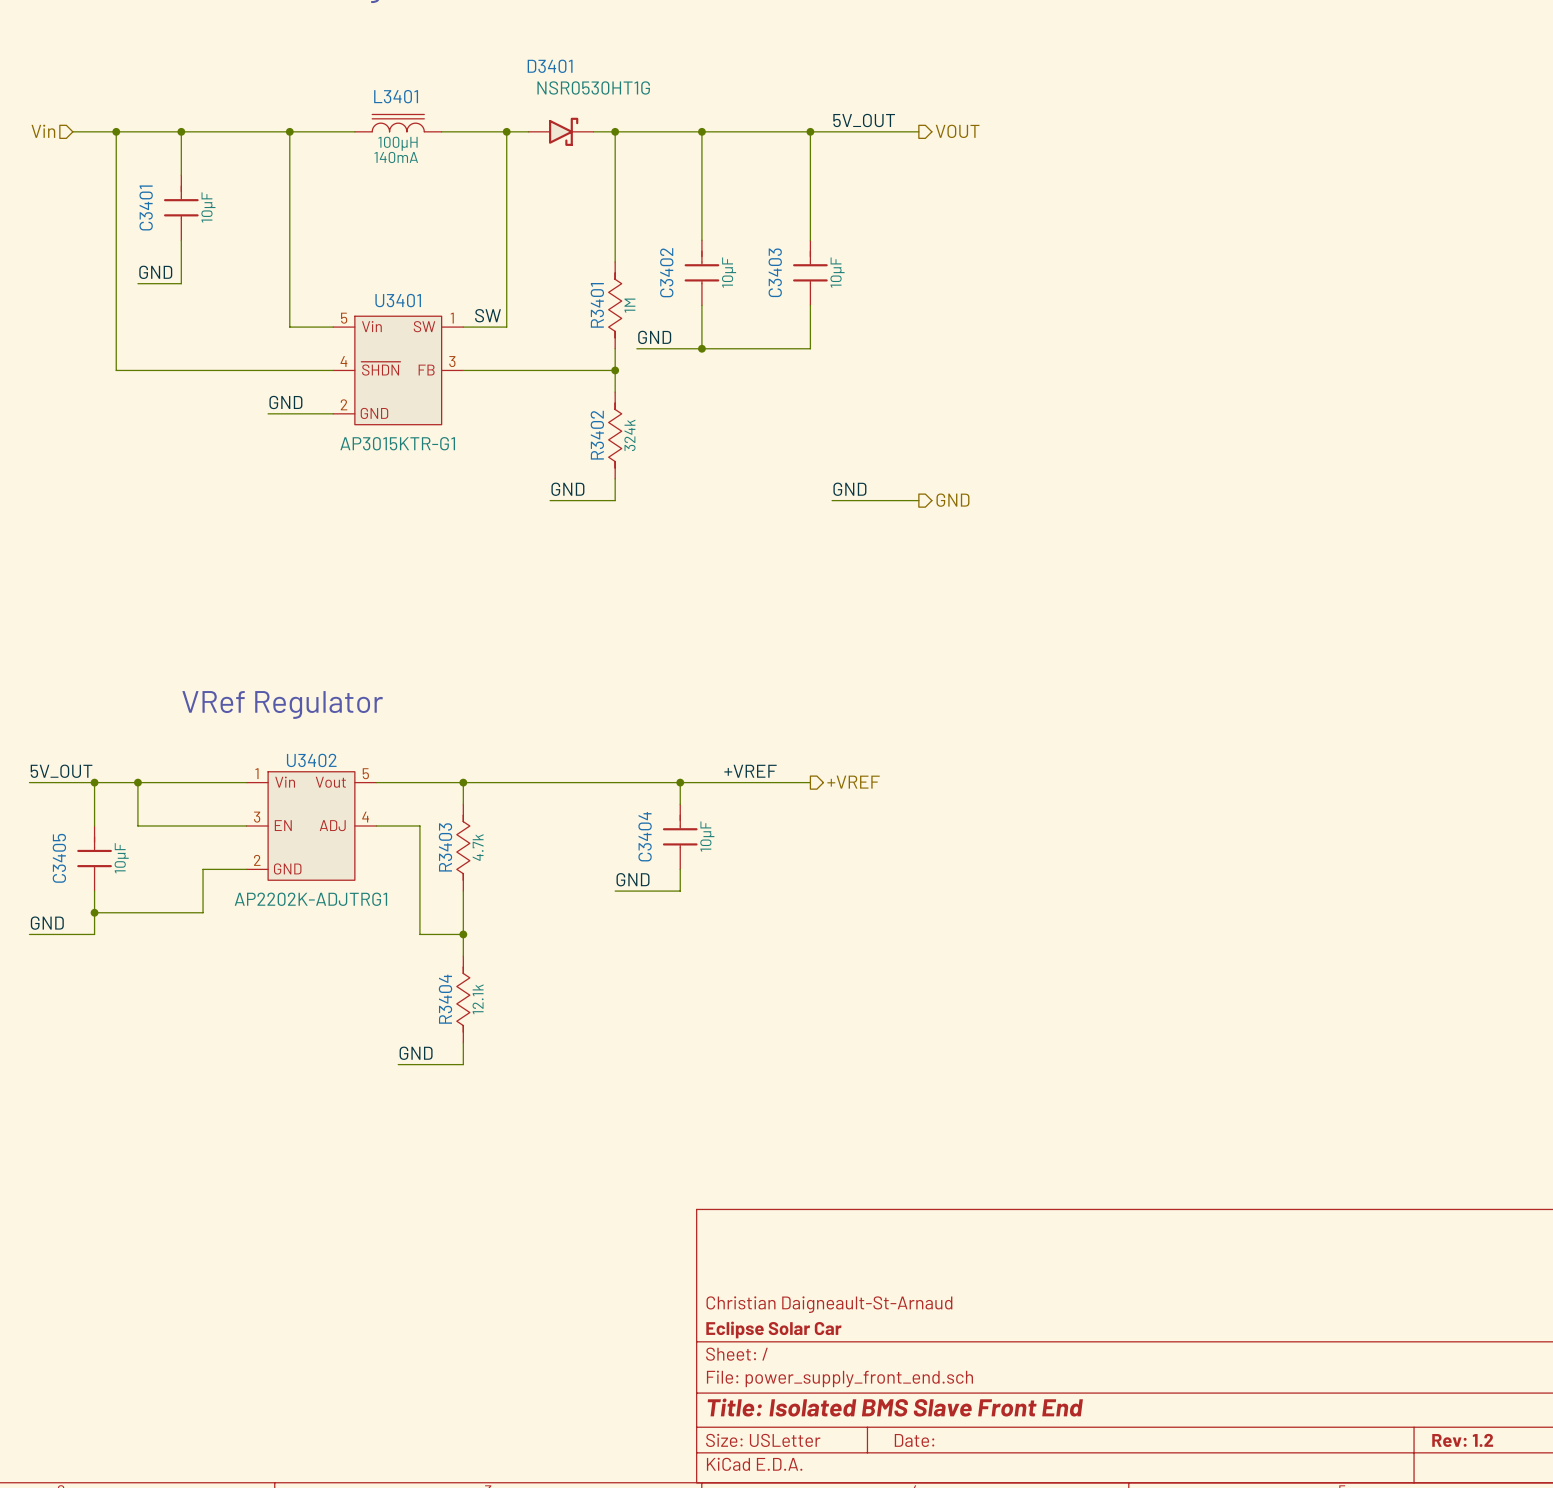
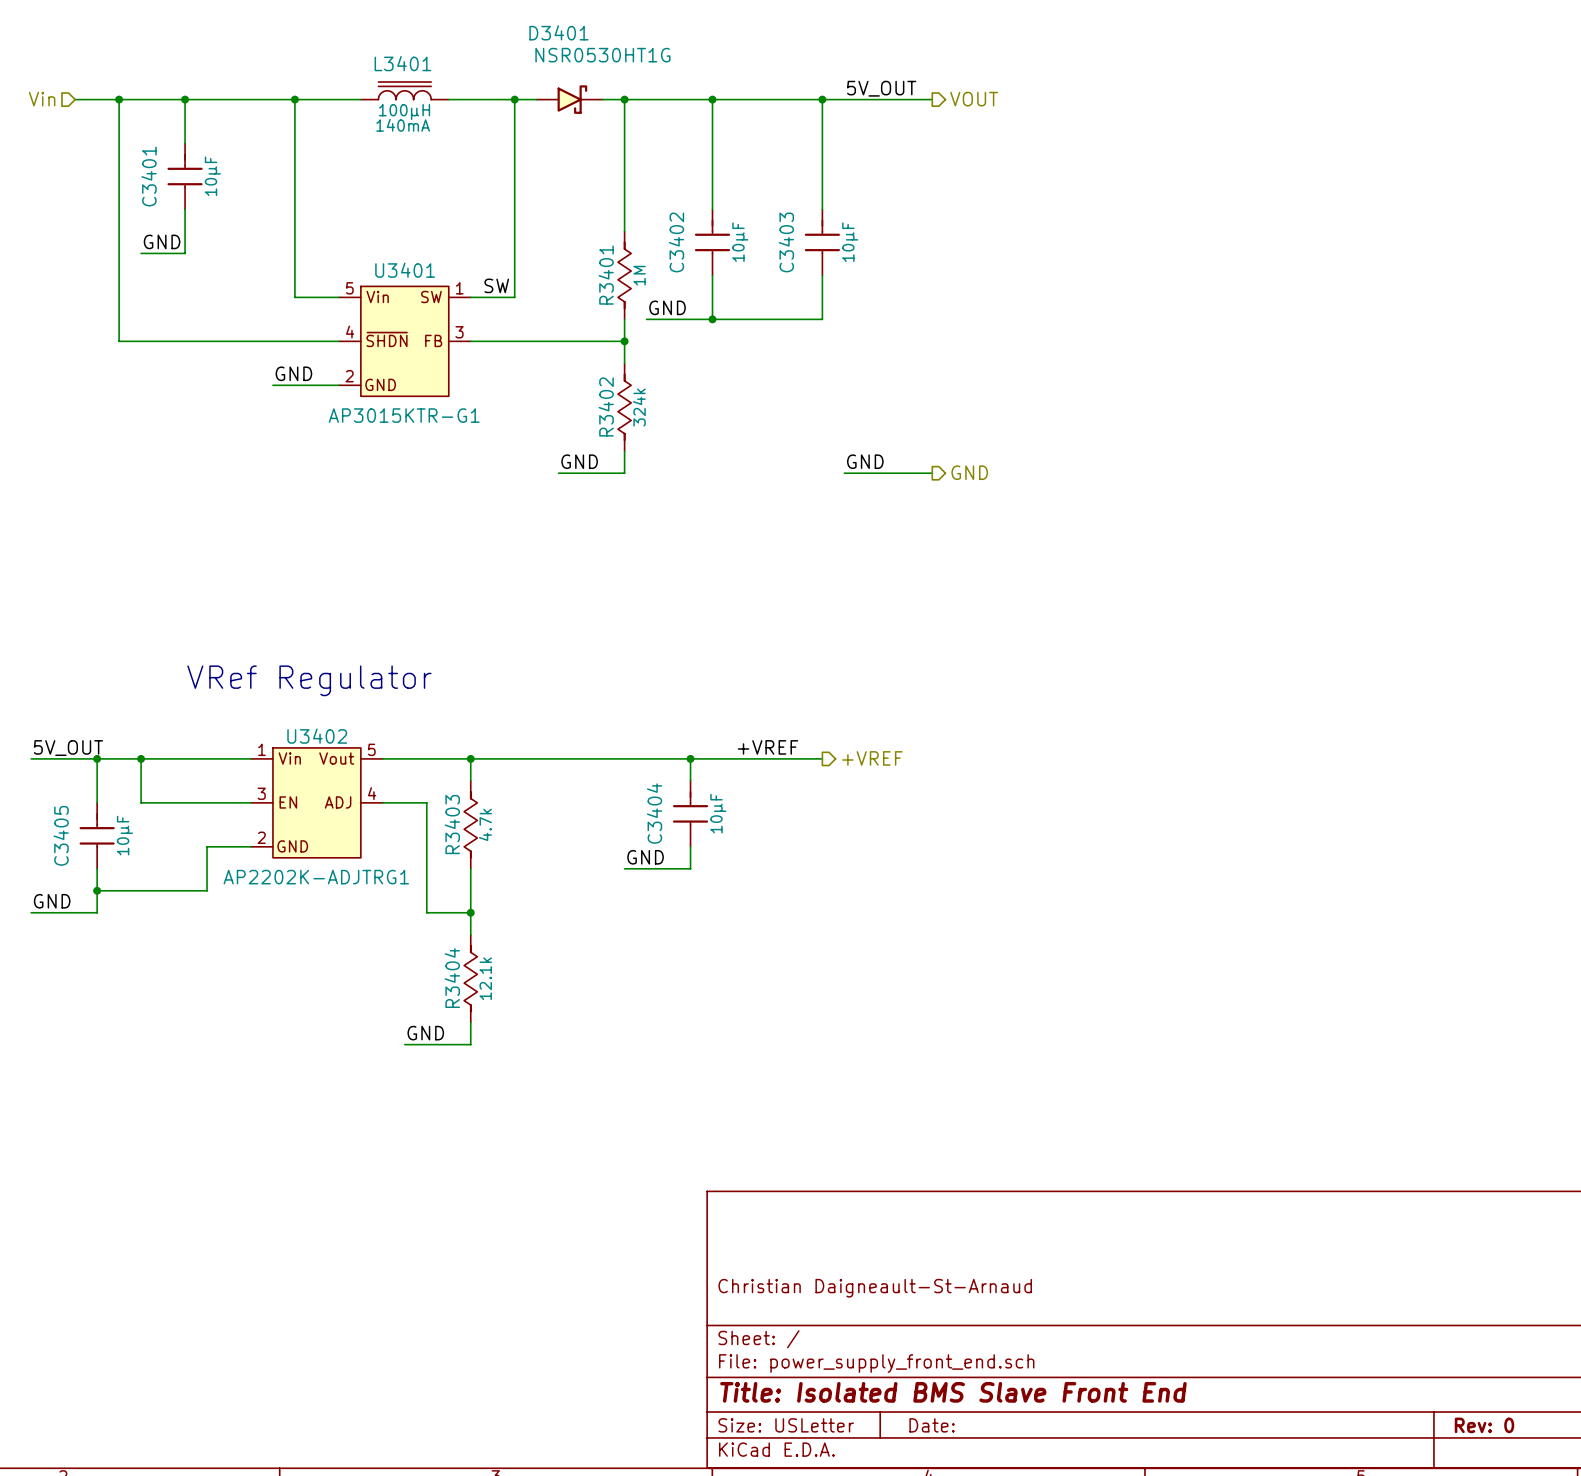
title block: Eclipse Solar Car (773, 1329) -> none
title block: Rev: 1.2 (1462, 1440) -> Rev: 0 (1484, 1425)

